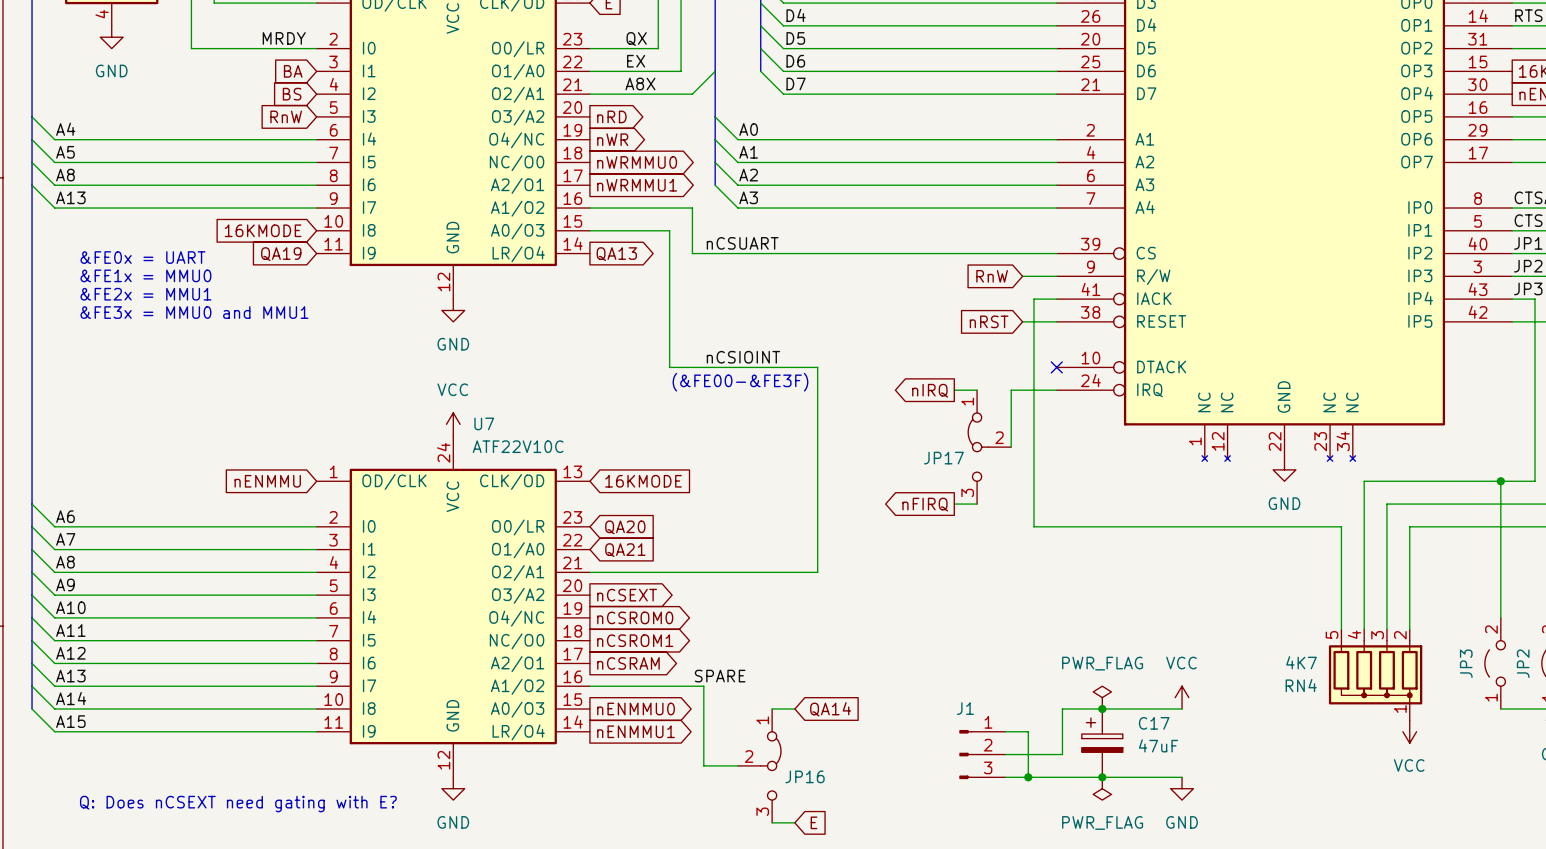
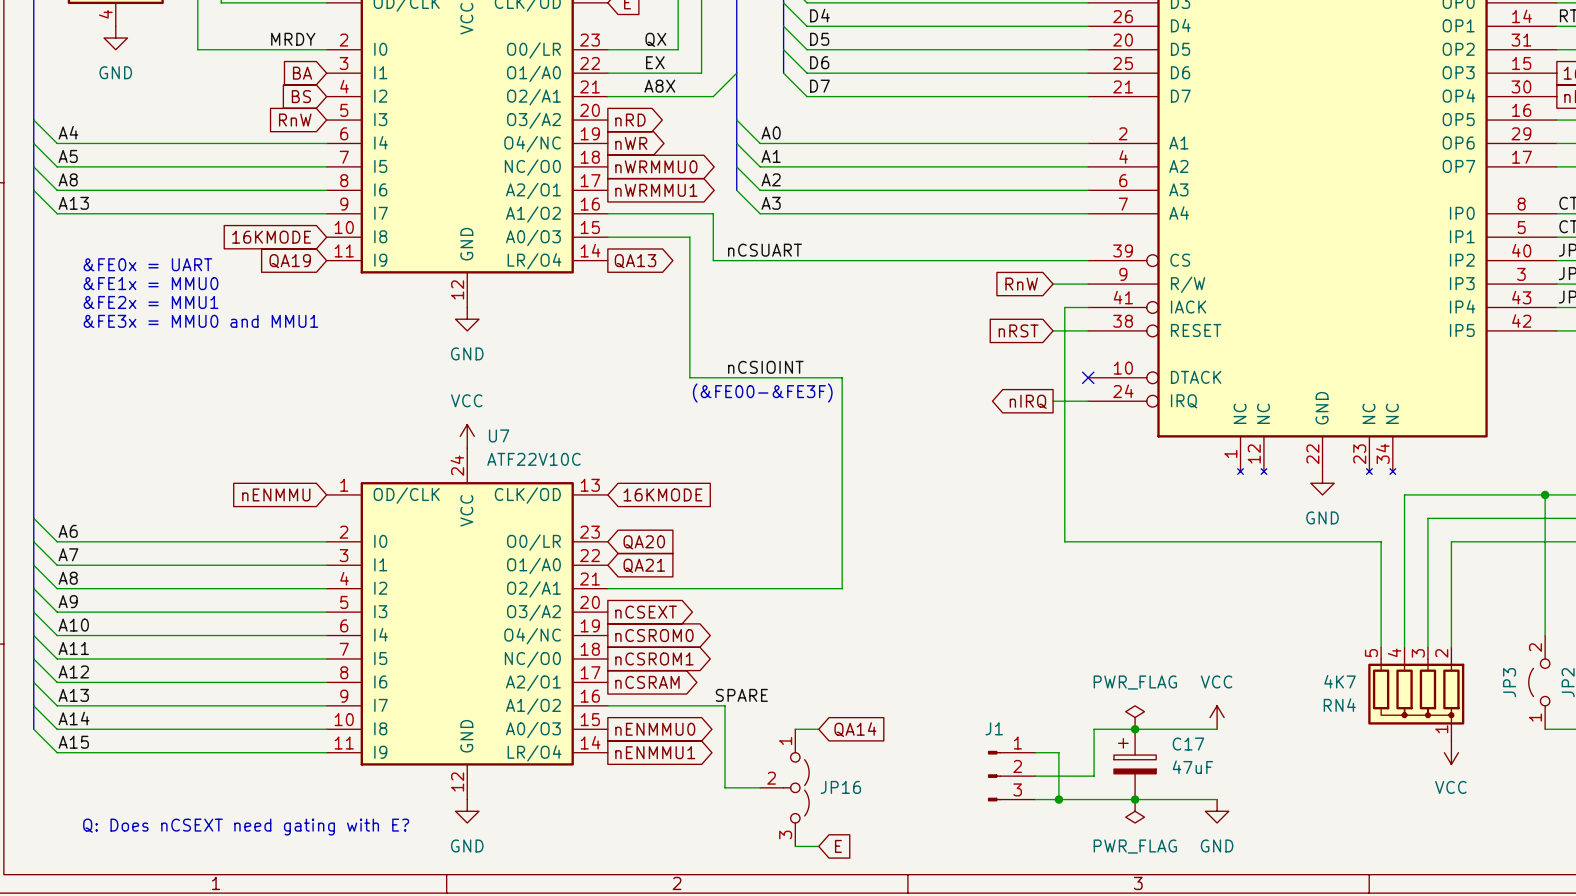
global label position: nIRQ (930, 390) -> nIRQ (1028, 401)
wire: (954, 390) (977, 390) -> none
wire: (1022, 390) (1011, 390) (1011, 447) -> none
JP17: (989, 447) -> none
global label: nFIRQ (925, 504) -> none
wire: (954, 504) (977, 504) -> none
JP16 symbol: [737, 709, 782, 823] -> [760, 729, 810, 847]

